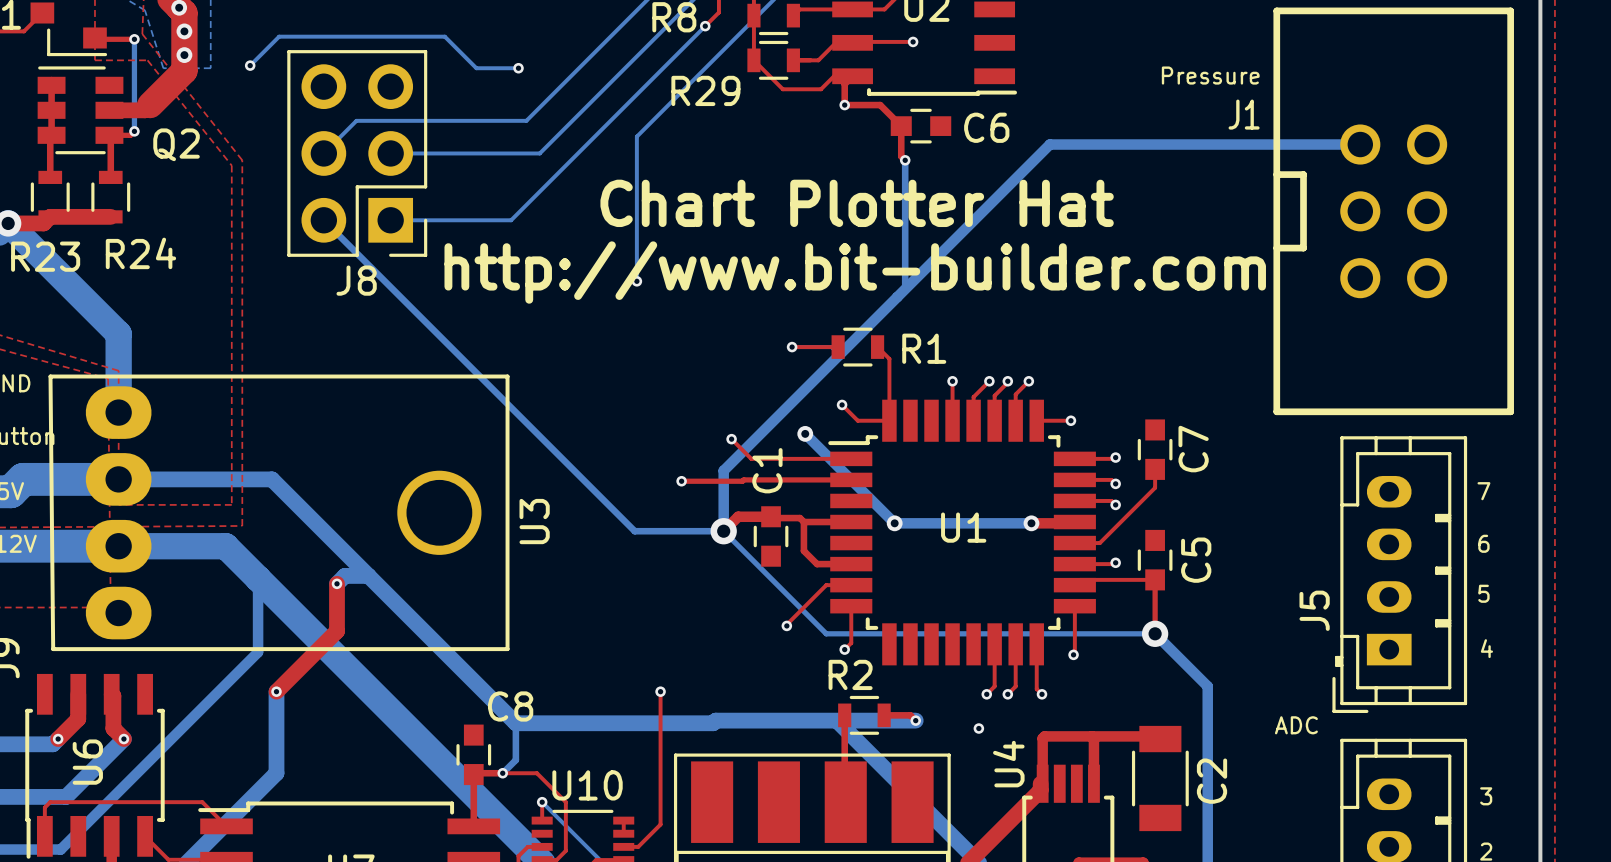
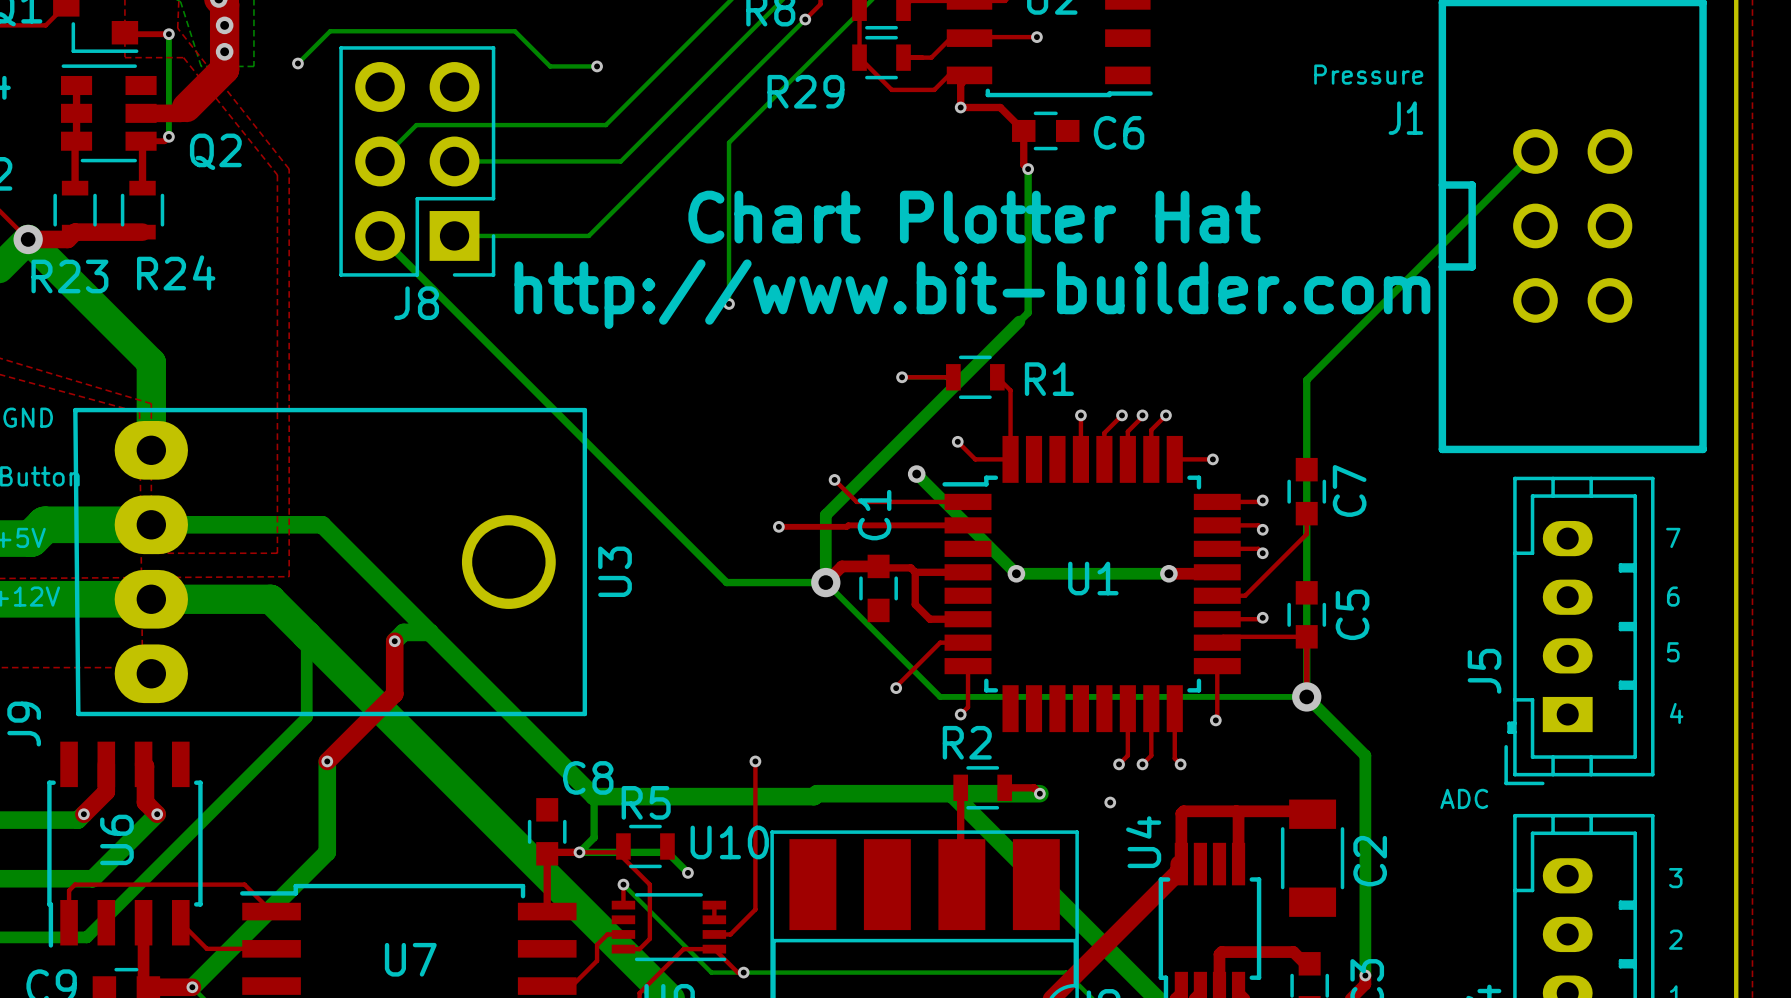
bottom track: (1360, 144) (1049, 144) (897, 297) -> (1535, 151) (1306, 380) (1306, 696)
R5: none -> (645, 846)
bottom track: none -> (579, 852) (667, 852) (687, 872)
U10 name position: U10 (587, 785) -> U10 (729, 842)
via: none -> (687, 872)

